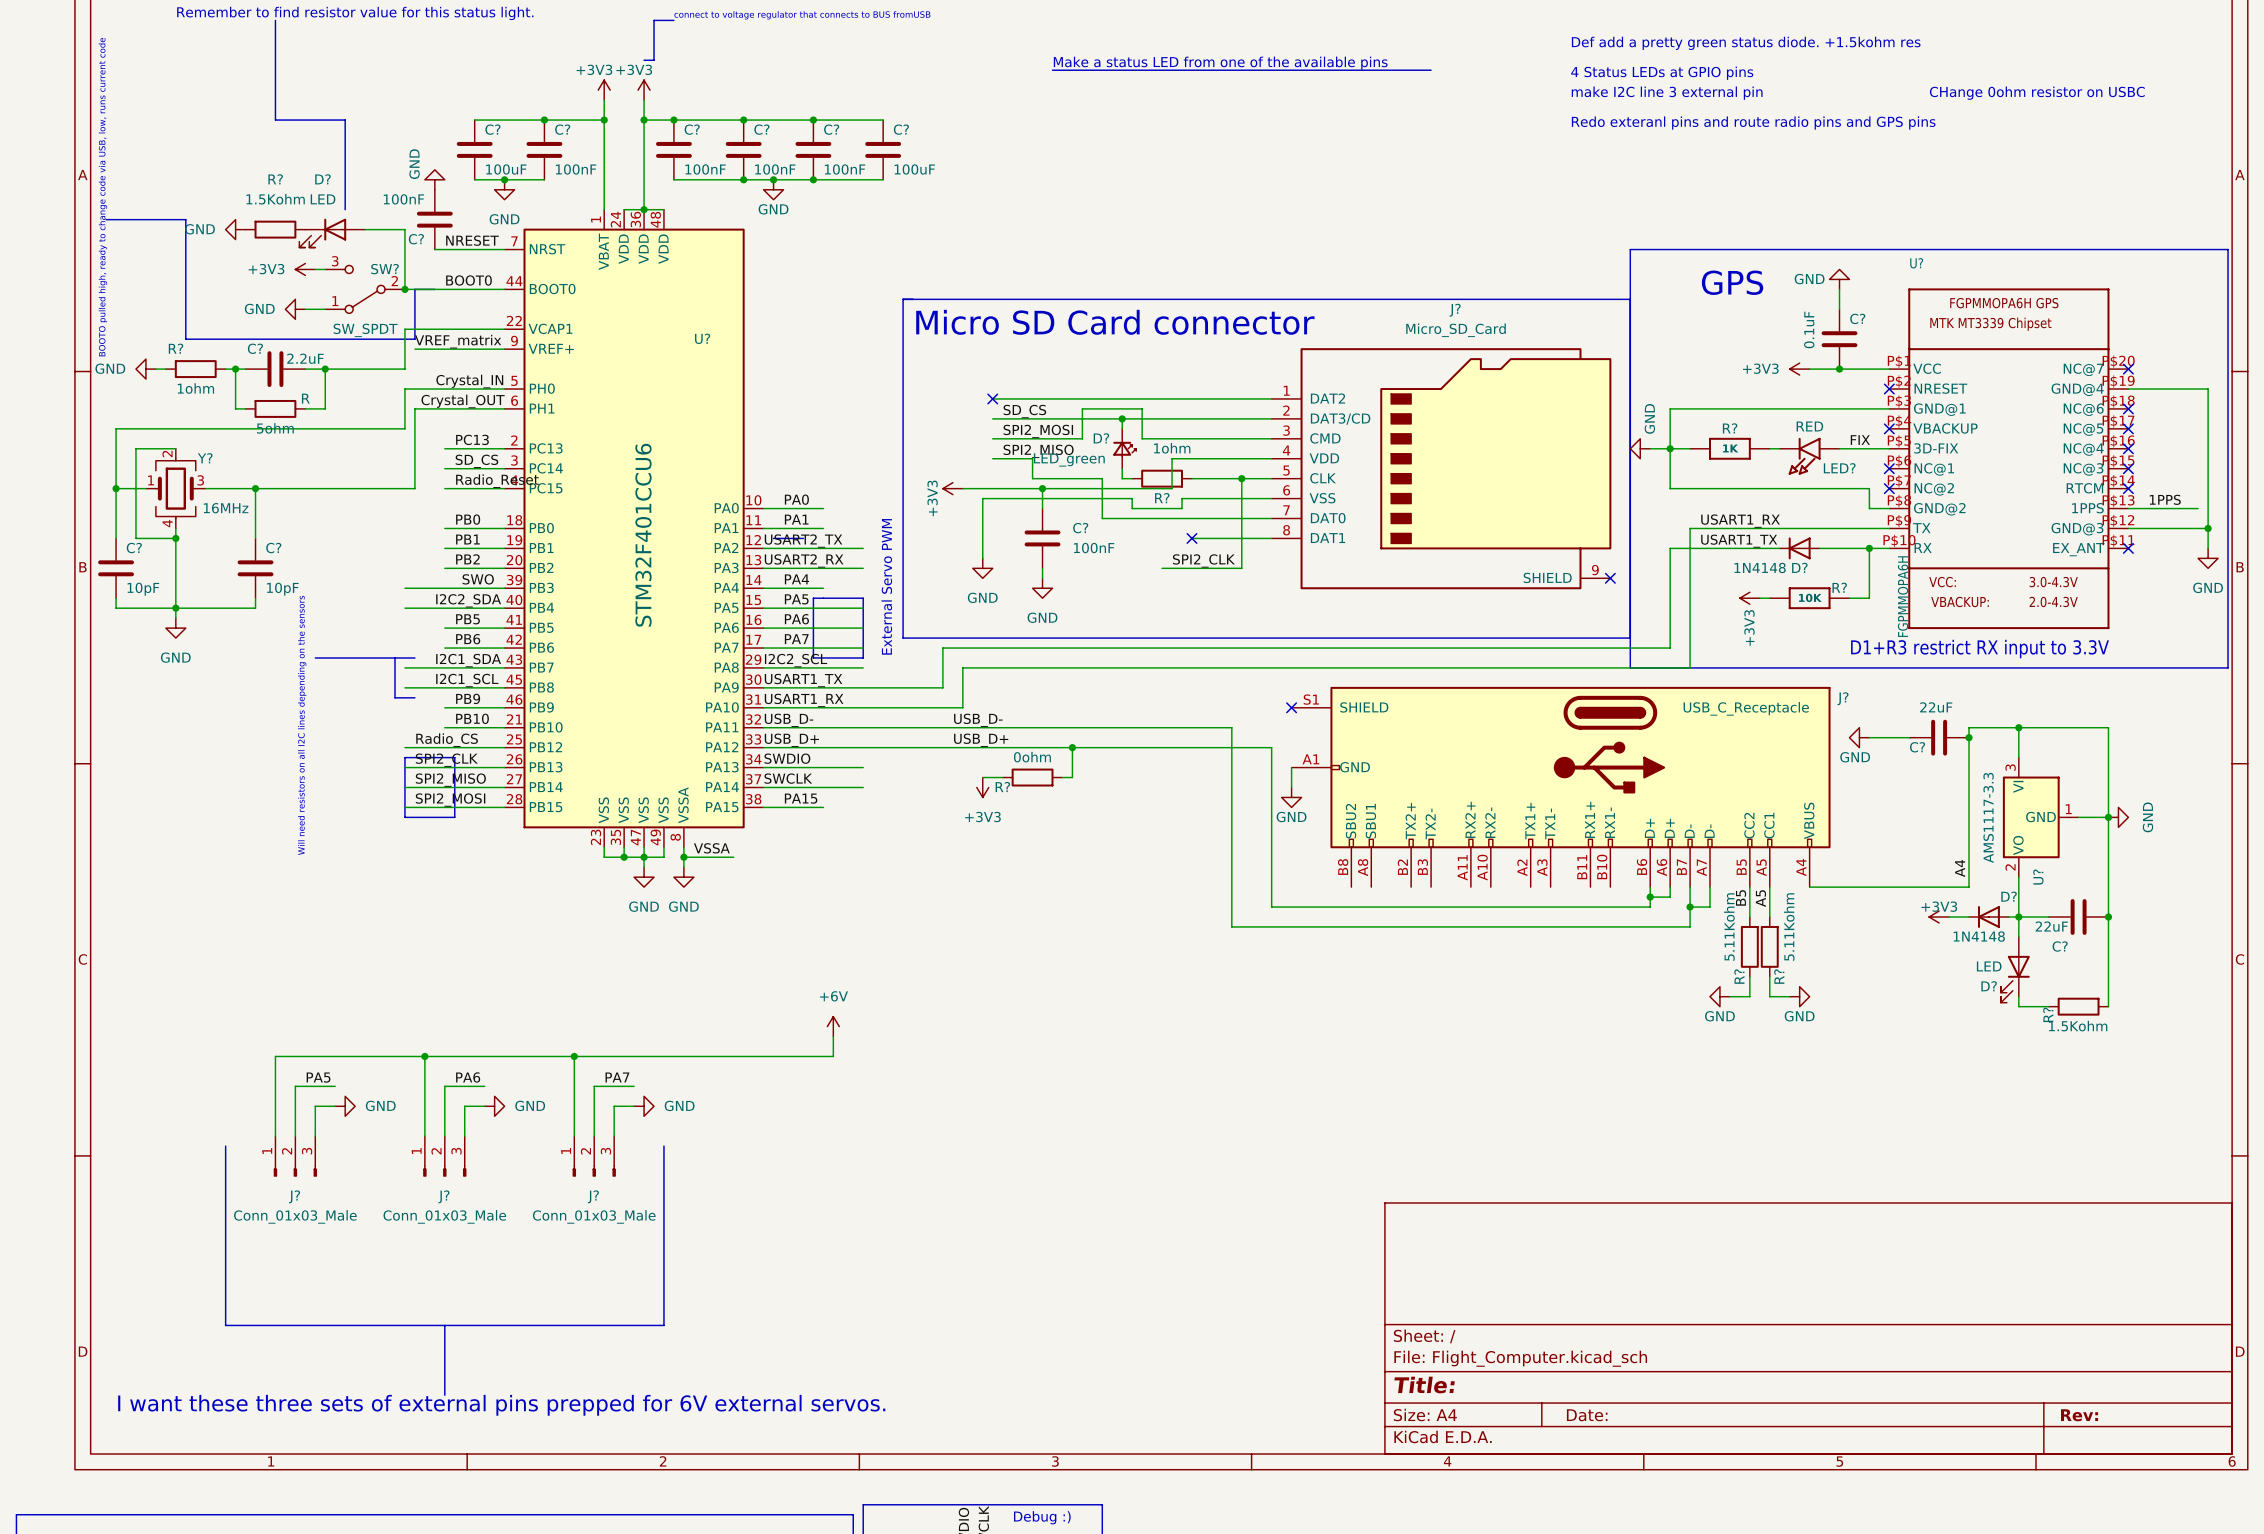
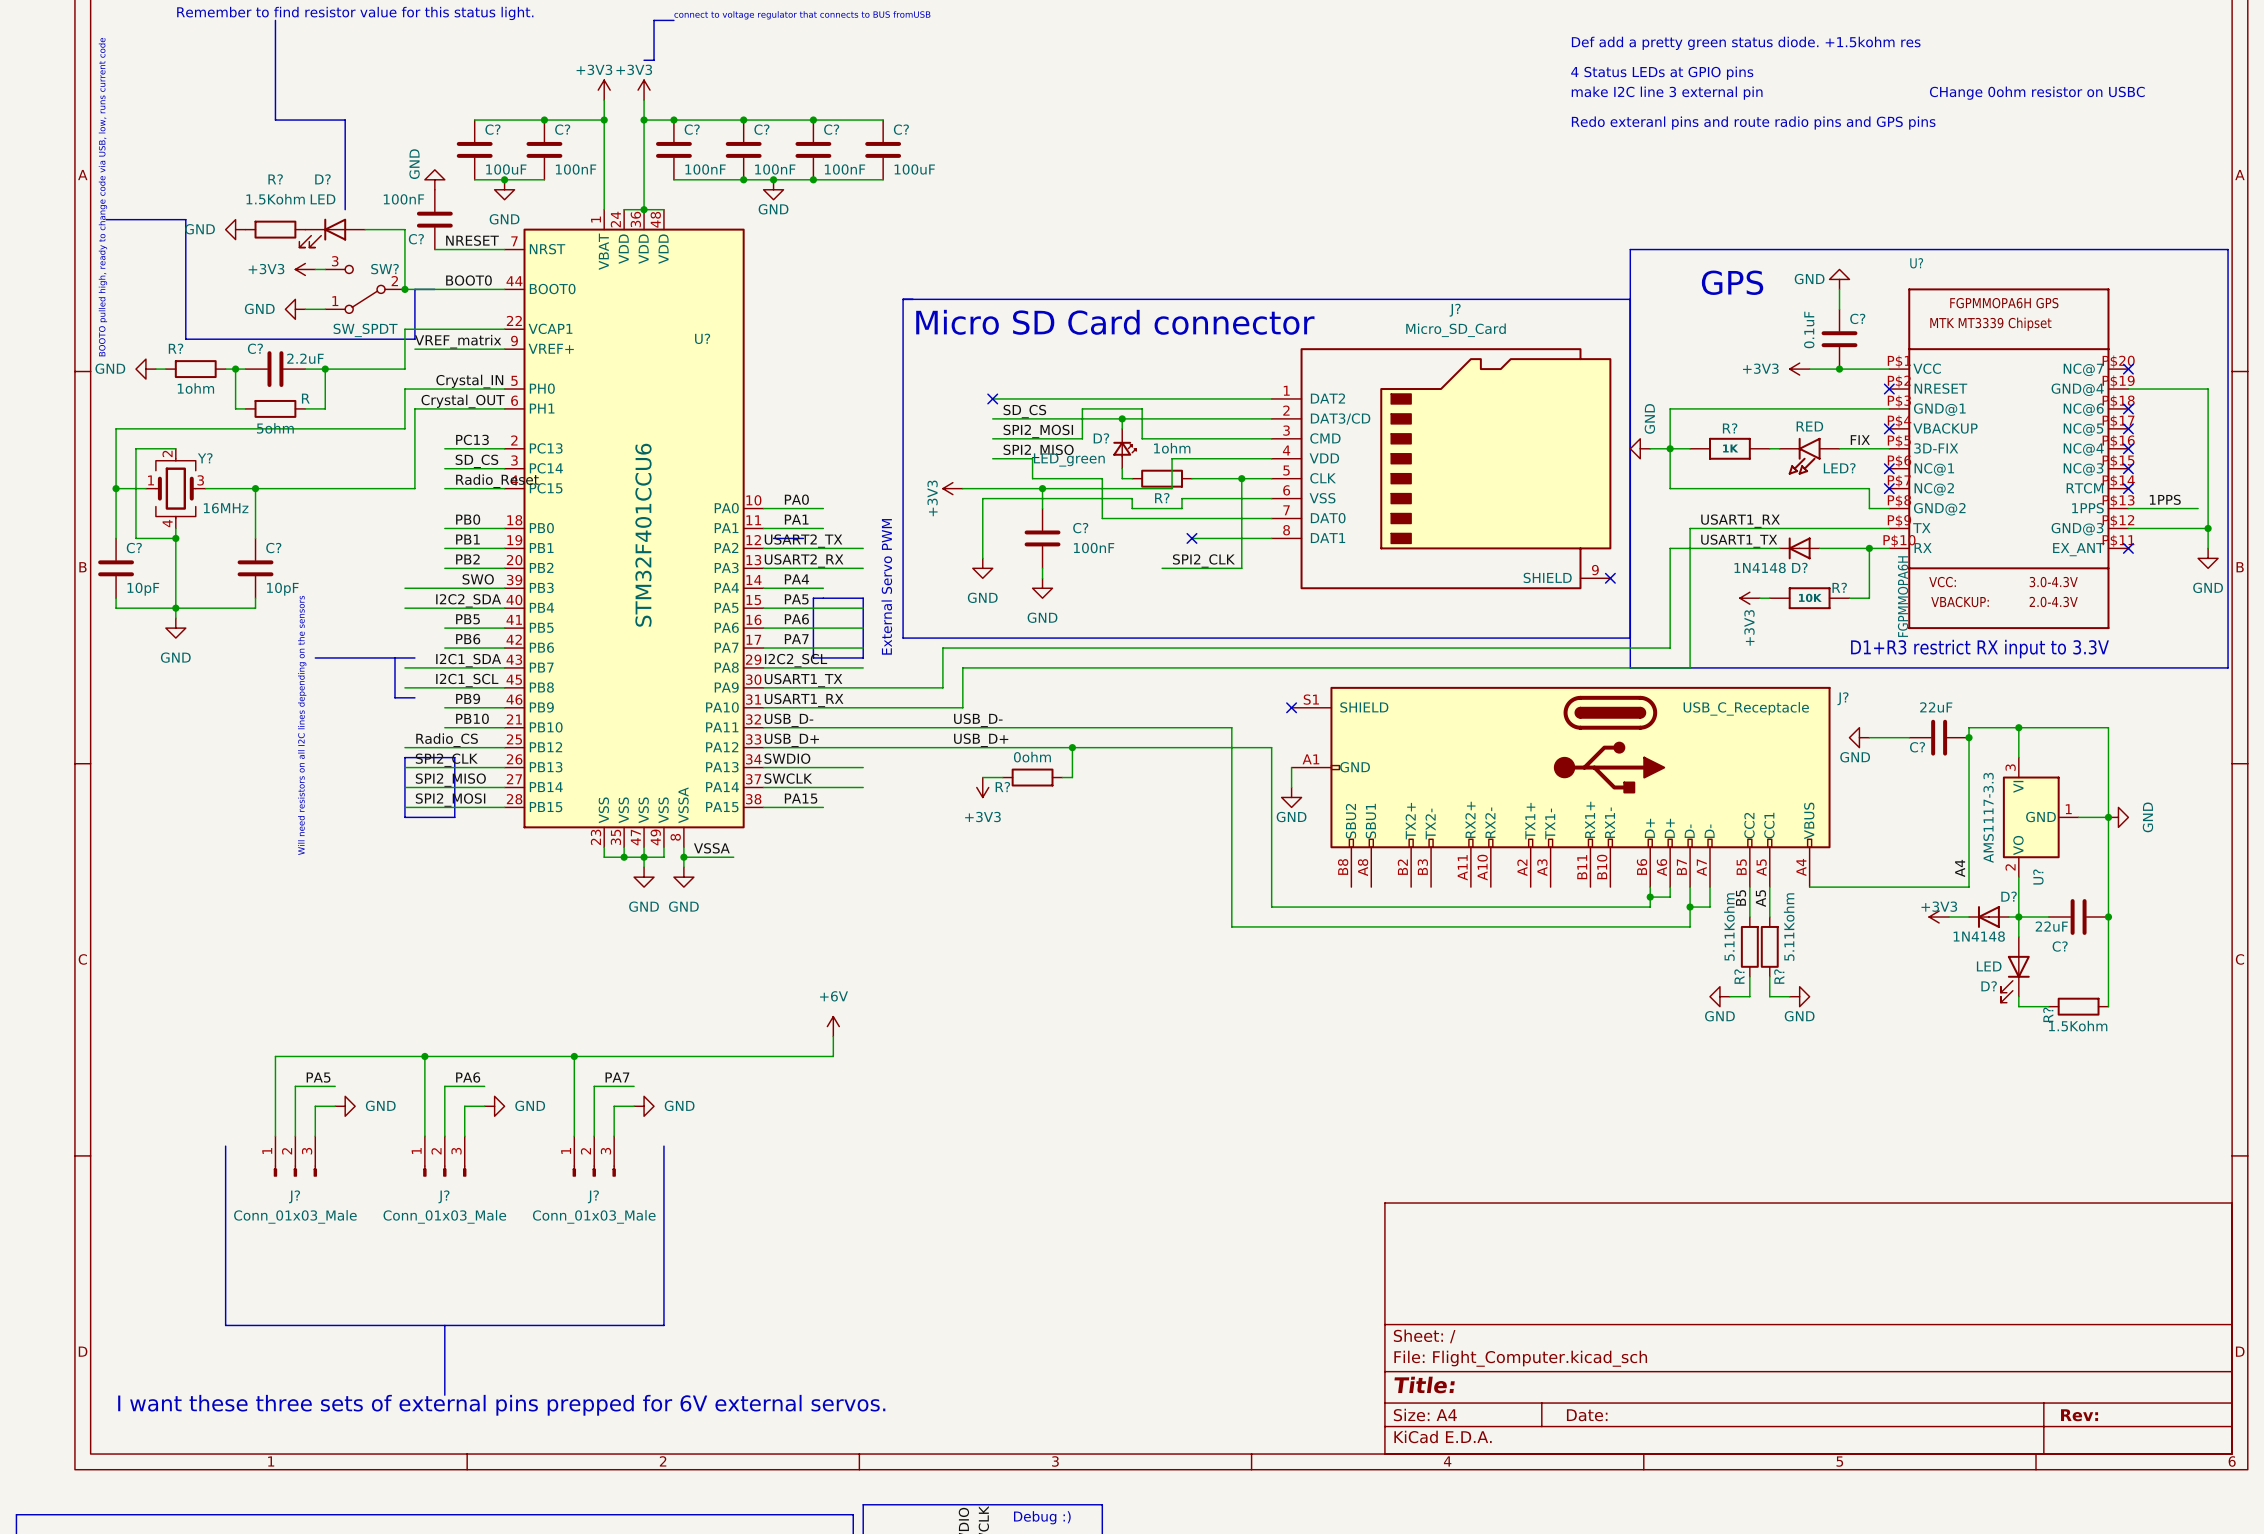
text: Make a status LED from one of the available pins (1220, 63) -> none
line: (1052, 70) (1431, 70) -> none

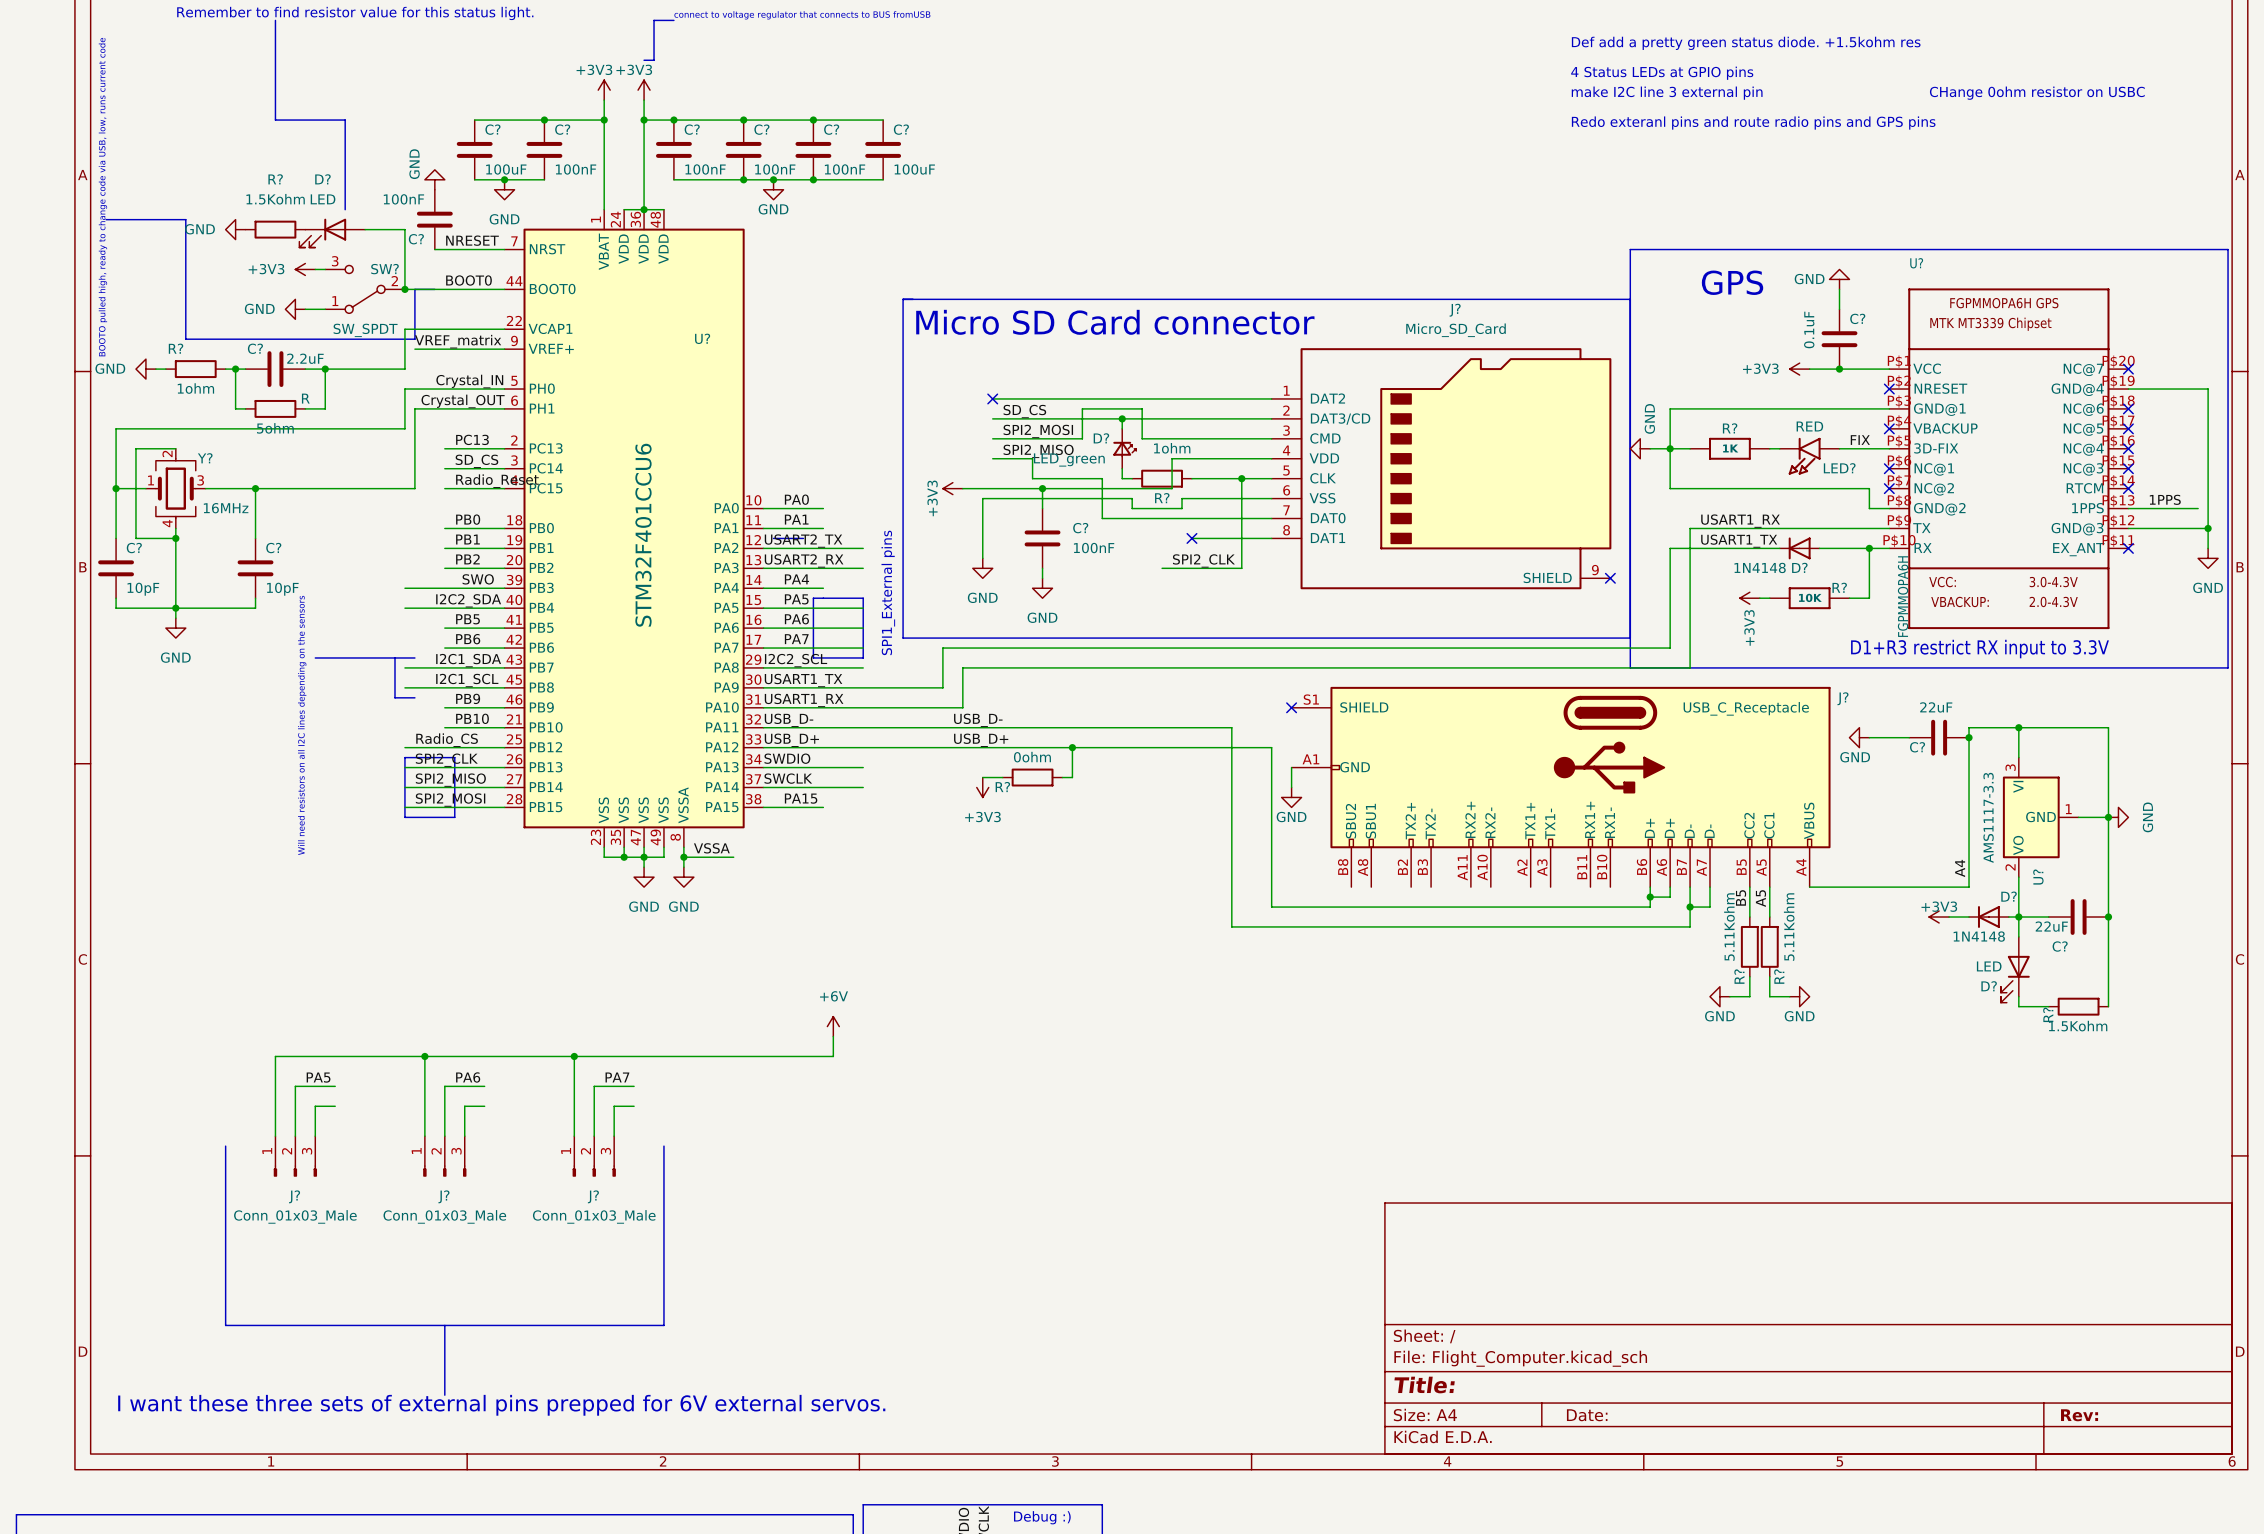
text: External Servo PWM (886, 586) -> SPI1_External pins (888, 592)
power symbol: GND (345, 1106) -> none
power symbol: GND (494, 1106) -> none
power symbol: GND (644, 1106) -> none

